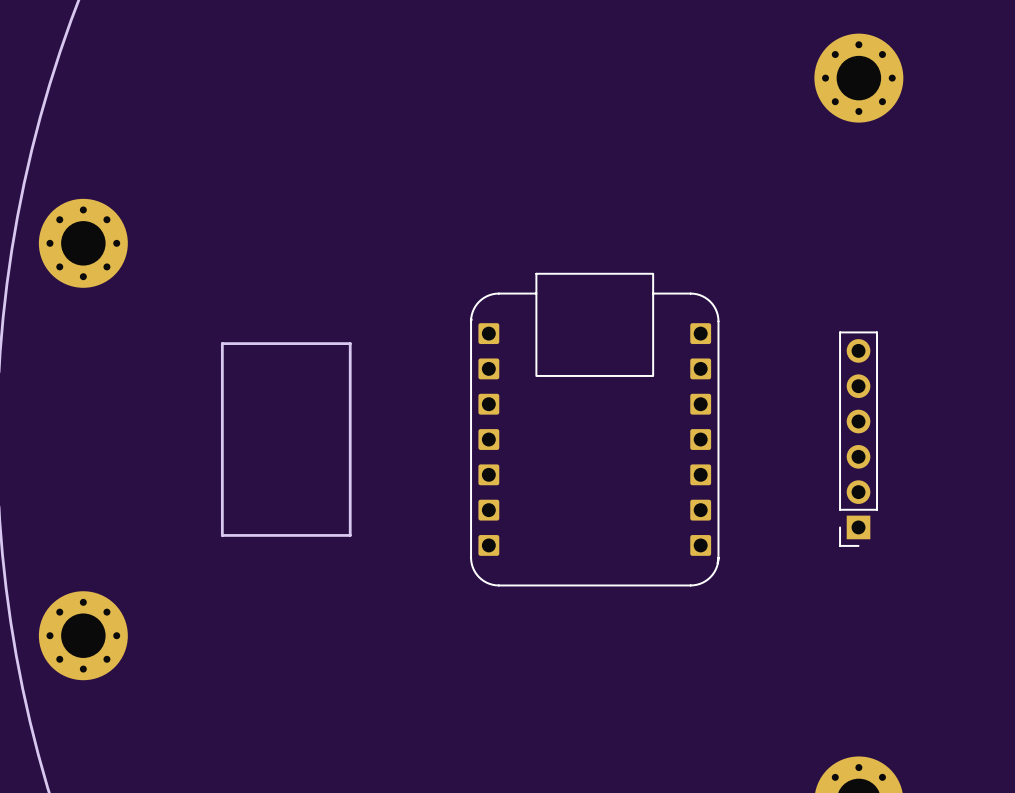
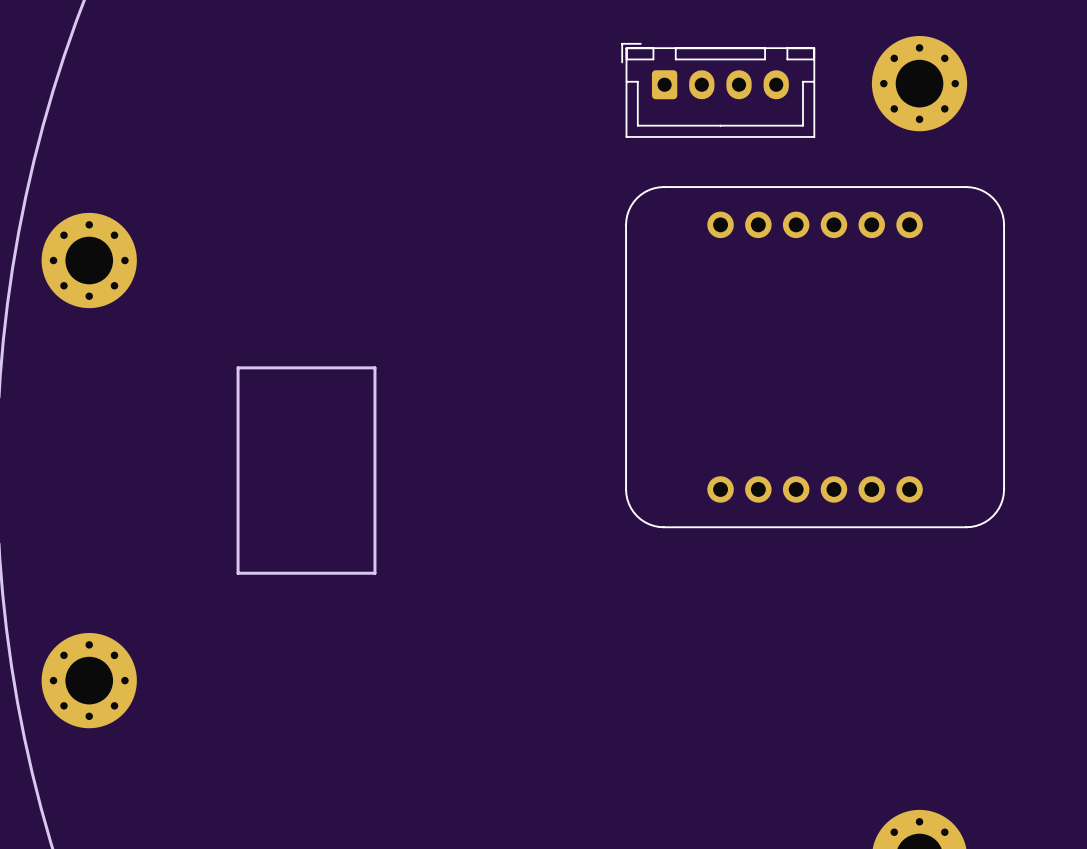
part: none -> (718, 90)
part: none -> (815, 357)
part: (594, 429) -> none
part: (858, 439) -> none

